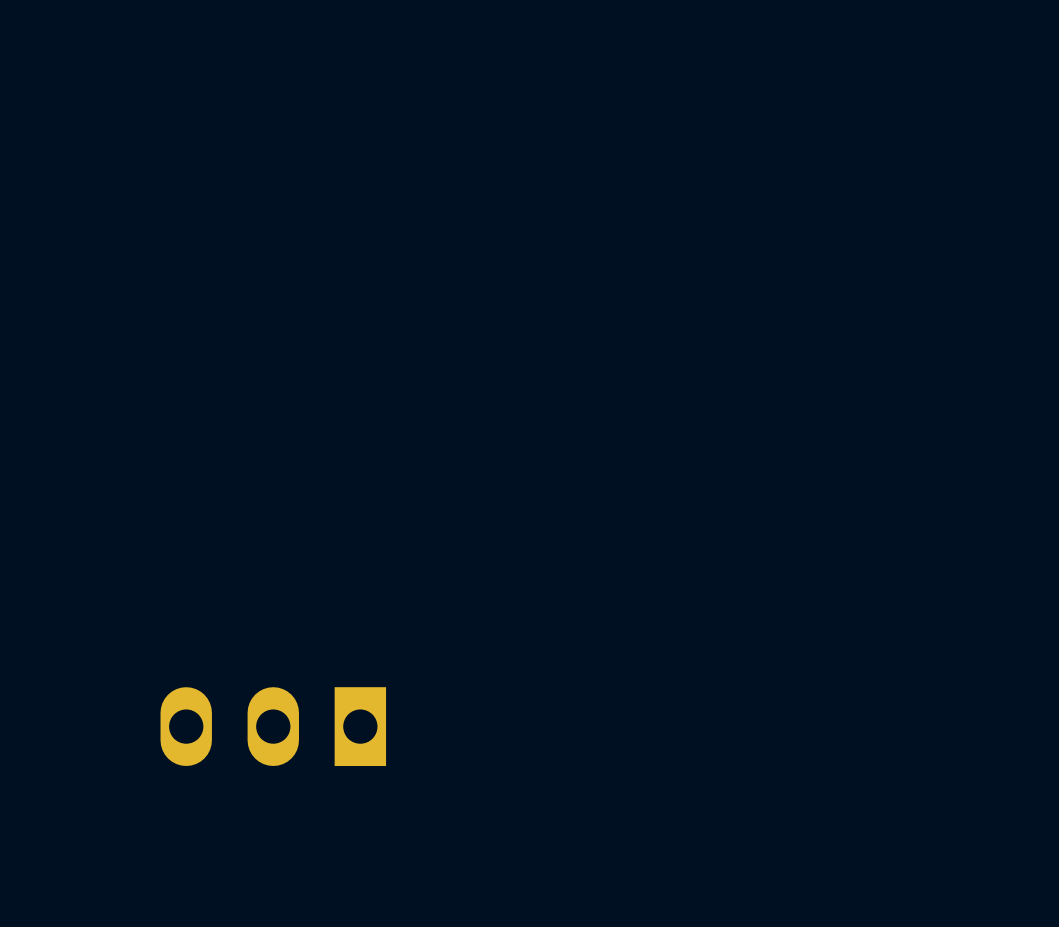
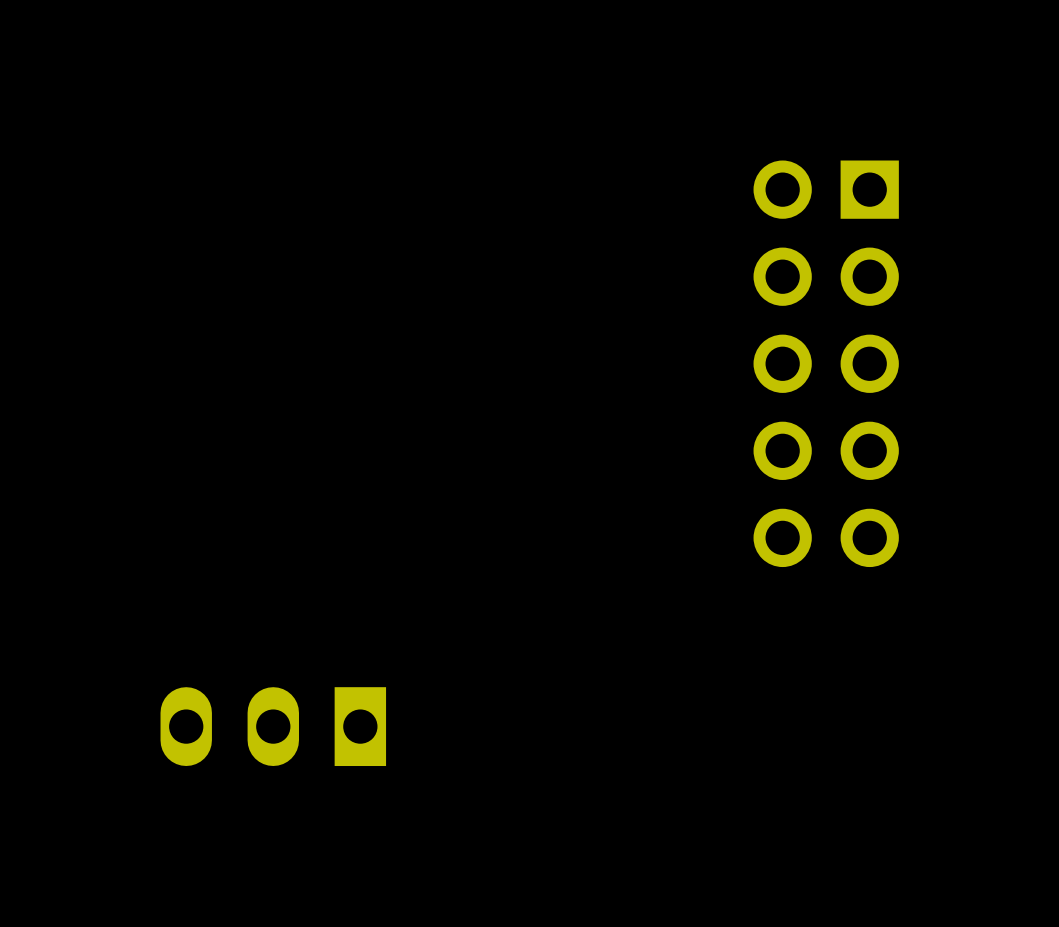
part: none -> (826, 363)

